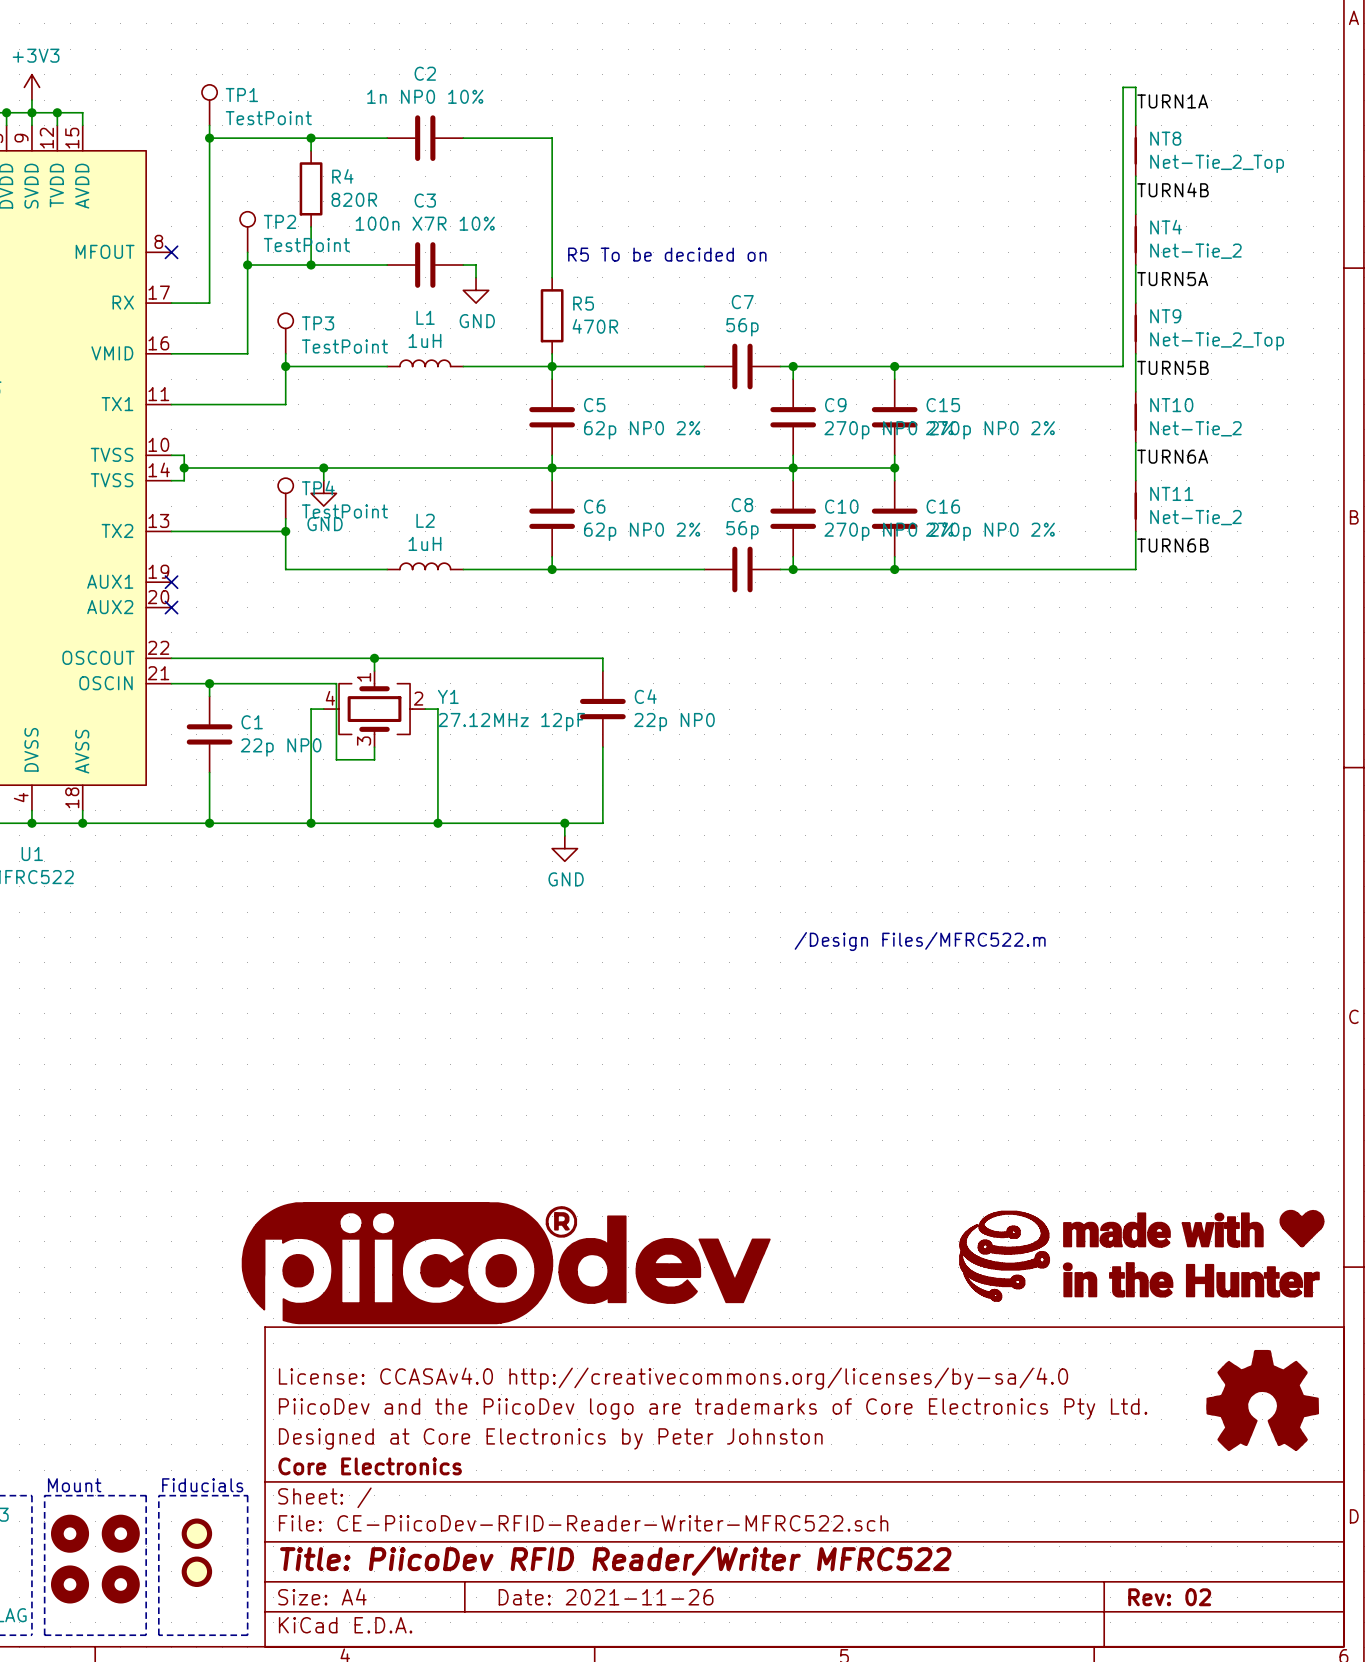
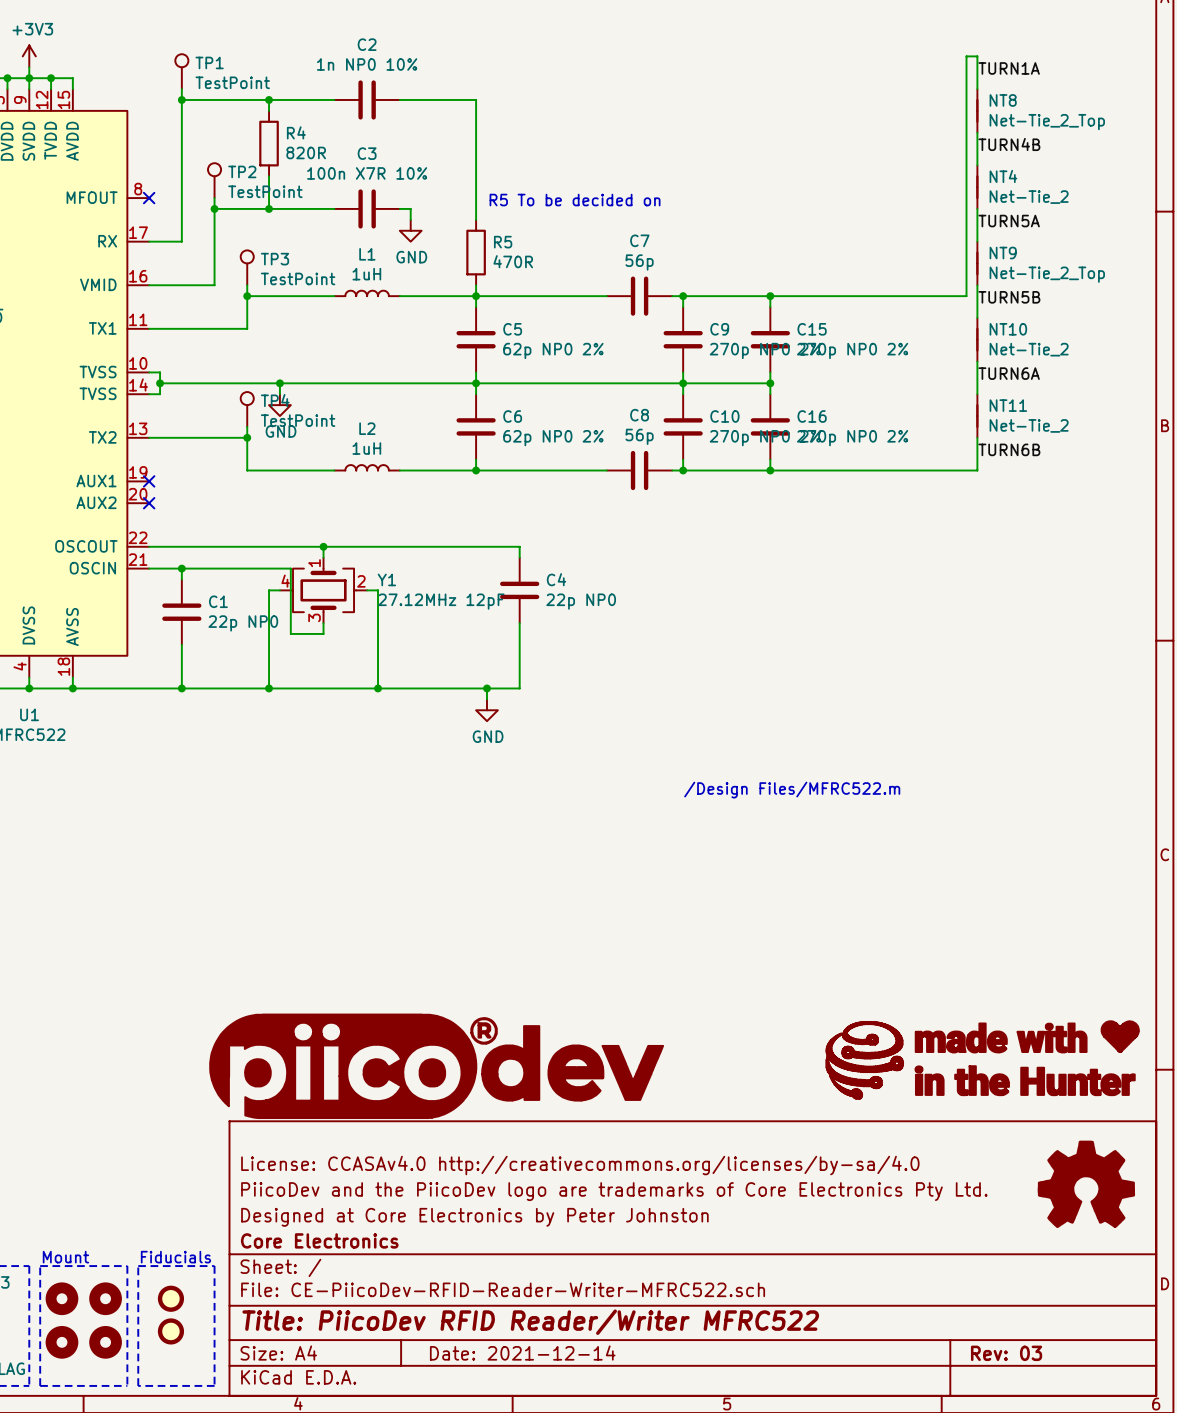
title block: Date: 2021-11-26 (606, 1597) -> Date: 2021-12-14 (522, 1353)
title block: Rev: 02 (1169, 1597) -> Rev: 03 (1006, 1353)

